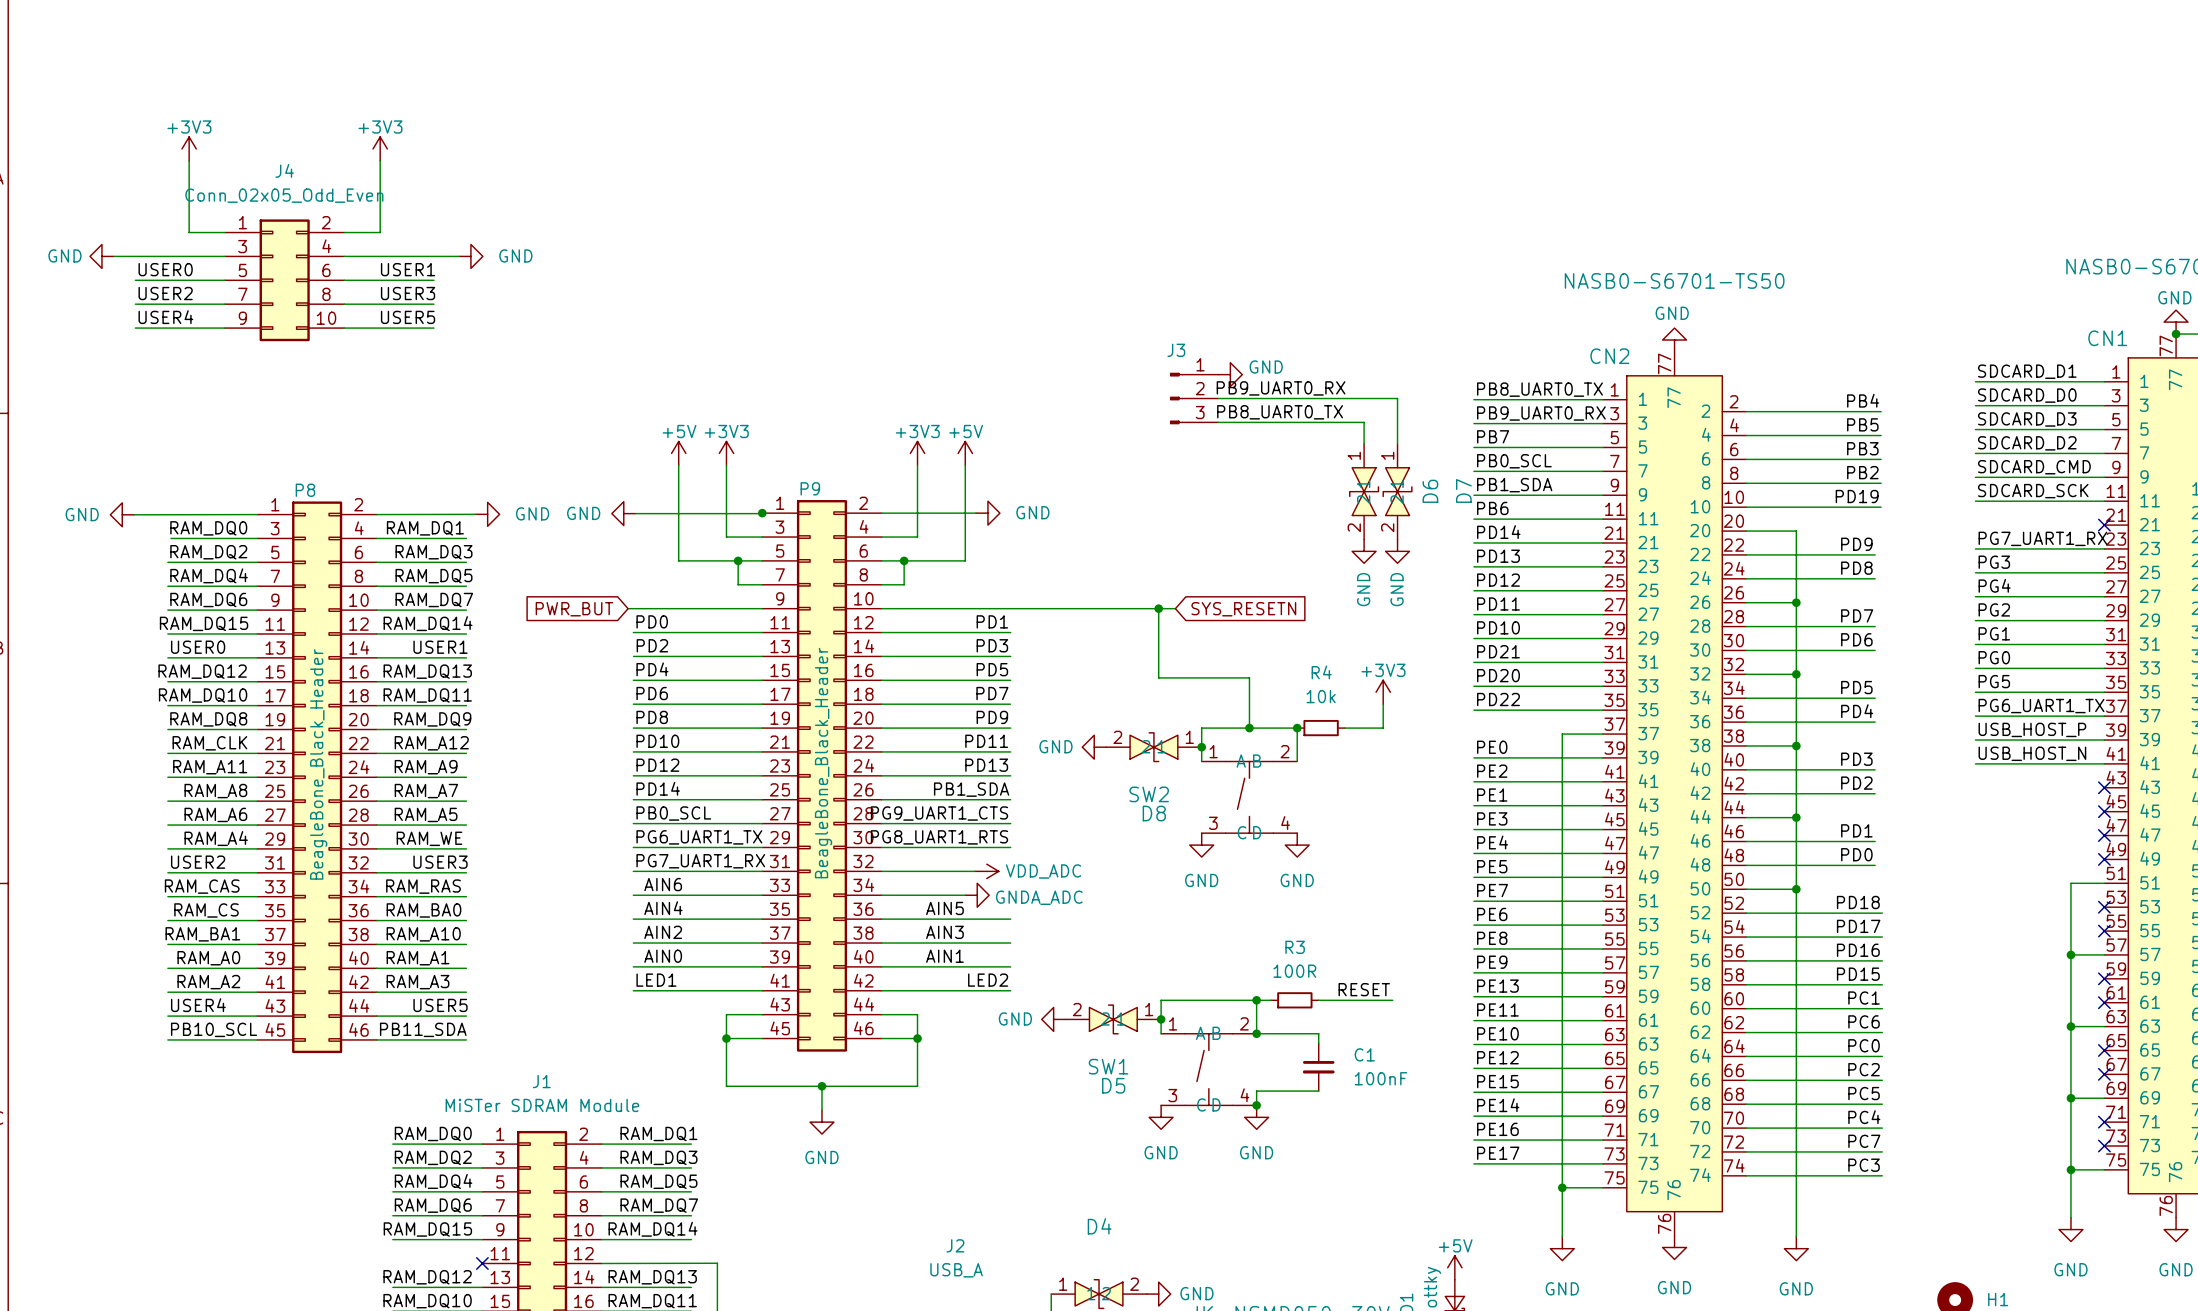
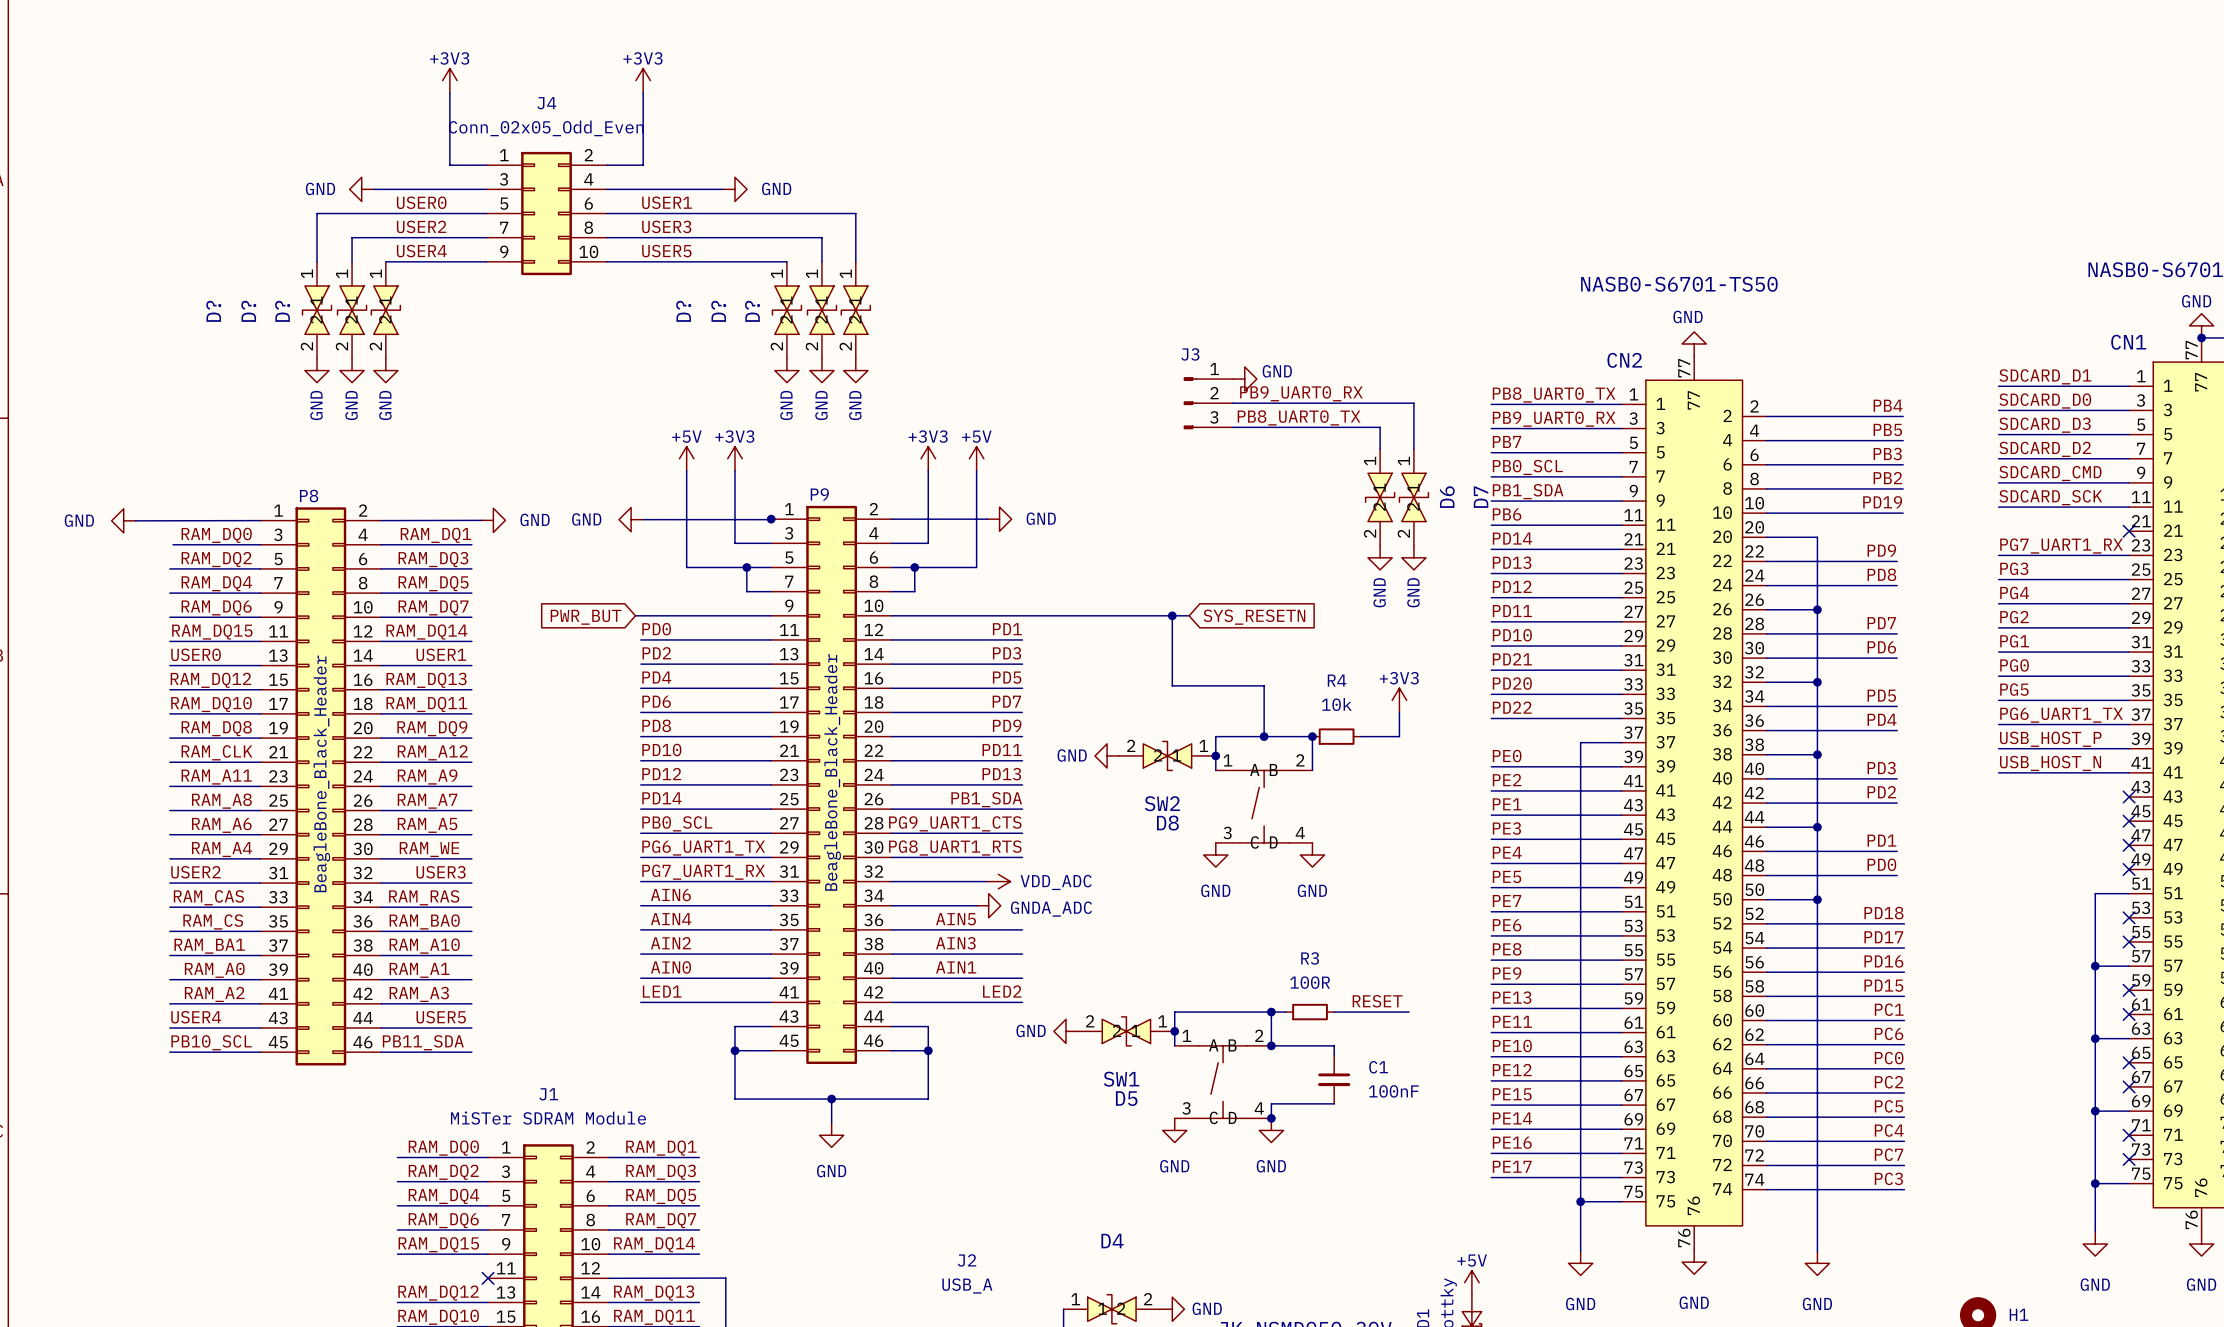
power symbol: none -> +3V3 (643, 80)
wire: none -> (449, 92) (449, 165) (486, 165)
wire: none -> (643, 92) (643, 165) (606, 165)
power symbol: +3V3 (189, 148) -> none
power symbol position: +3V3 (380, 148) -> +3V3 (449, 80)
wire: (189, 160) (189, 232) (224, 232) -> none
wire: (380, 160) (380, 232) (344, 232) -> none
power symbol: none -> GND (361, 189)
wire: none -> (373, 189) (486, 189)
wire: none -> (606, 189) (722, 189)
power symbol: none -> GND (734, 189)
label: none -> USER0 (421, 202)
label: none -> USER1 (667, 202)
wire: none -> (486, 213) (316, 213) (316, 261)
wire: none -> (606, 213) (855, 213) (855, 261)
label: none -> USER2 (421, 226)
label: none -> USER3 (666, 226)
wire: none -> (486, 237) (352, 237) (352, 261)
wire: none -> (606, 237) (821, 237) (821, 261)
label: none -> USER5 (666, 251)
power symbol: GND (101, 256) -> none
wire: (113, 256) (224, 256) -> none
wire: (344, 256) (458, 256) -> none
power symbol: GND (470, 256) -> none
wire: none -> (385, 261) (486, 261)
wire: none -> (606, 261) (786, 261)
label: USER0 (165, 269) -> none
label: USER1 (408, 269) -> USER4 (421, 251)
wire: (135, 280) (224, 280) -> none
J4 position: (284, 280) -> (546, 213)
wire: (344, 280) (433, 280) -> none
label: USER2 (165, 293) -> none
label: USER3 (408, 293) -> none
wire: (135, 304) (224, 304) -> none
wire: (344, 304) (433, 304) -> none
D?: none -> (316, 310)
D?: none -> (352, 310)
D?: none -> (385, 310)
D?: none -> (786, 310)
D?: none -> (821, 310)
D?: none -> (855, 310)
label: USER4 (165, 317) -> none
label: USER5 (408, 317) -> none
wire: (135, 328) (224, 328) -> none
wire: (344, 328) (433, 328) -> none
power symbol: none -> GND (316, 370)
power symbol: none -> GND (352, 370)
power symbol: none -> GND (385, 370)
power symbol: none -> GND (786, 370)
power symbol: none -> GND (821, 370)
power symbol: none -> GND (855, 370)

